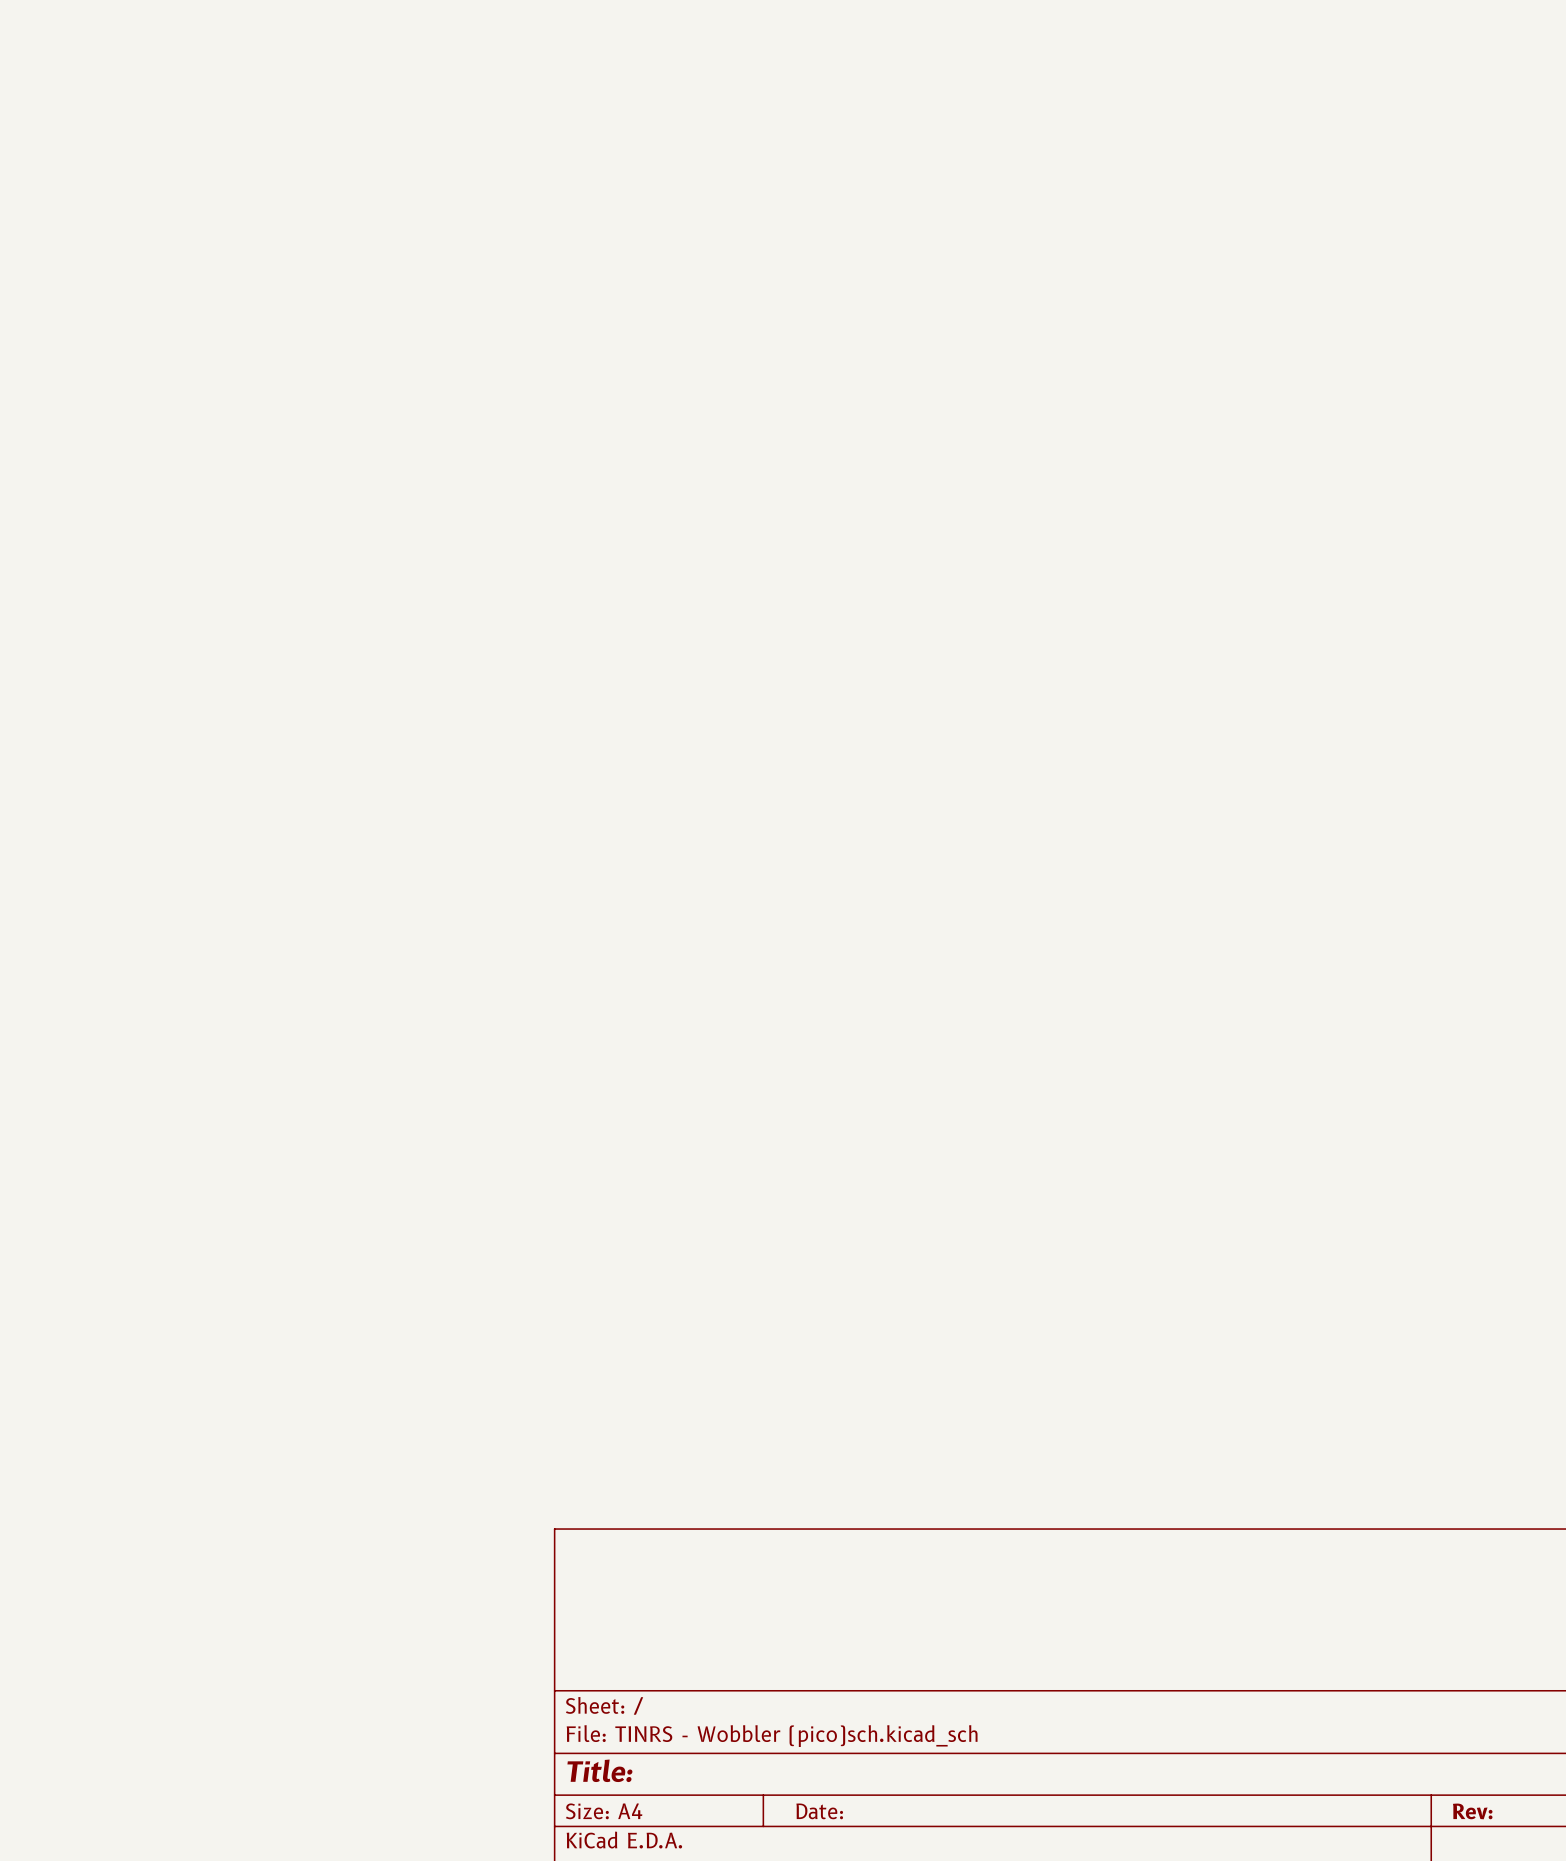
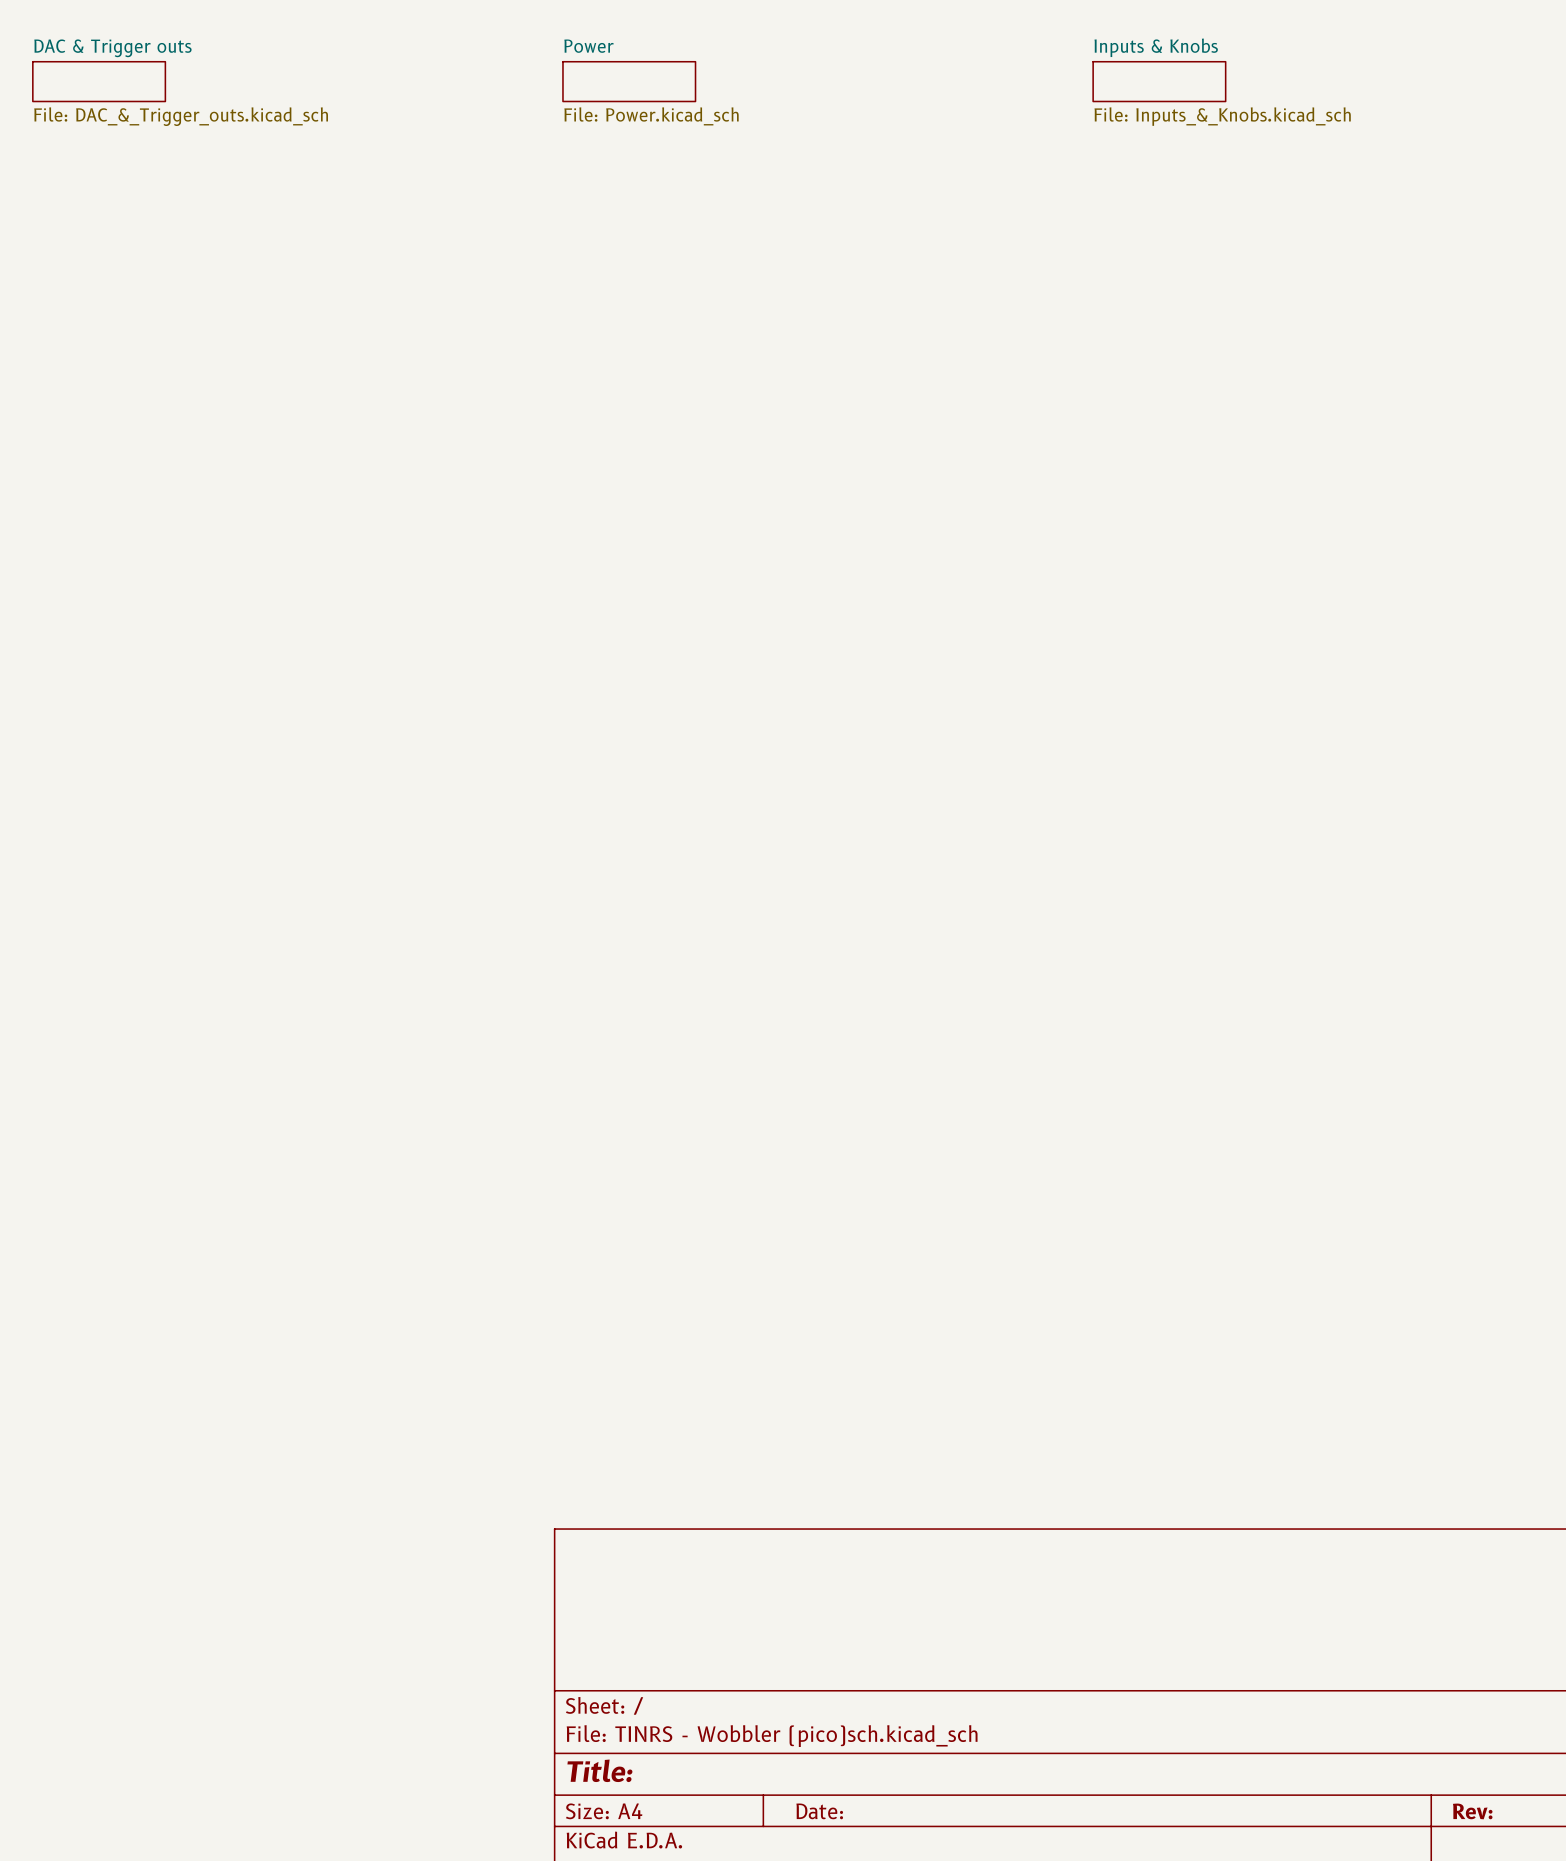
sheet DAC & Trigger outs: none -> File: DAC_&_Trigger_outs.kicad_sch (99, 81)
sheet Power: none -> File: Power.kicad_sch (629, 81)
sheet Inputs & Knobs: none -> File: Inputs_&_Knobs.kicad_sch (1159, 81)

